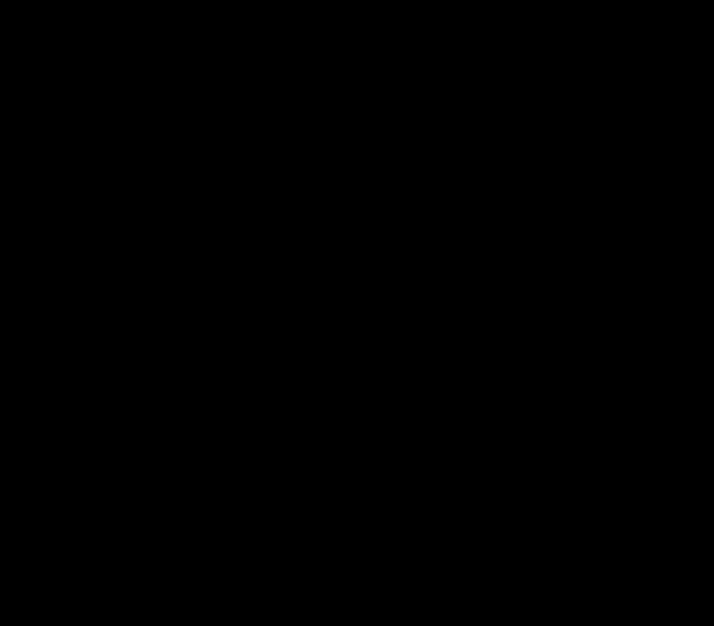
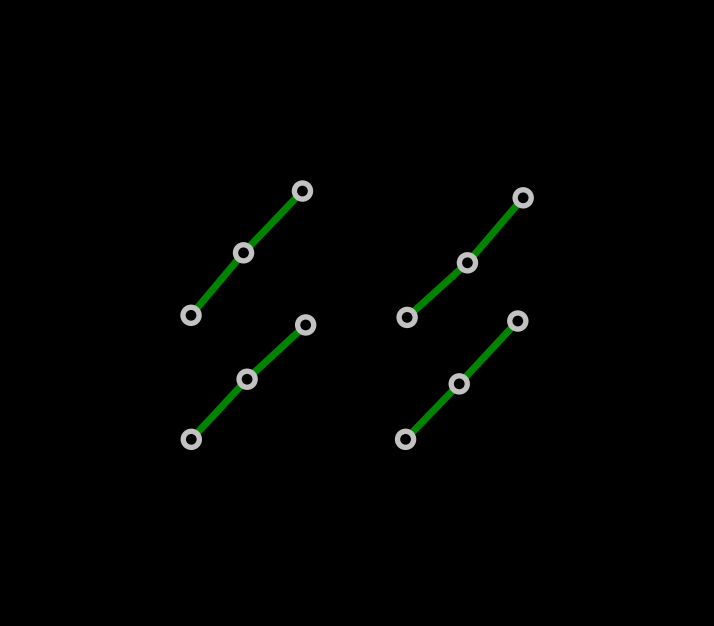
track: none -> (302, 191) (243, 252) (191, 315)
via: none -> (302, 191)
track: none -> (523, 197) (467, 262) (407, 317)
via: none -> (523, 197)
via: none -> (243, 252)
via: none -> (467, 262)
via: none -> (191, 315)
via: none -> (407, 317)
track: none -> (517, 321) (405, 439)
via: none -> (517, 321)
track: none -> (305, 324) (247, 379) (191, 439)
via: none -> (305, 324)
via: none -> (247, 379)
via: none -> (459, 383)
via: none -> (191, 439)
via: none -> (405, 439)

